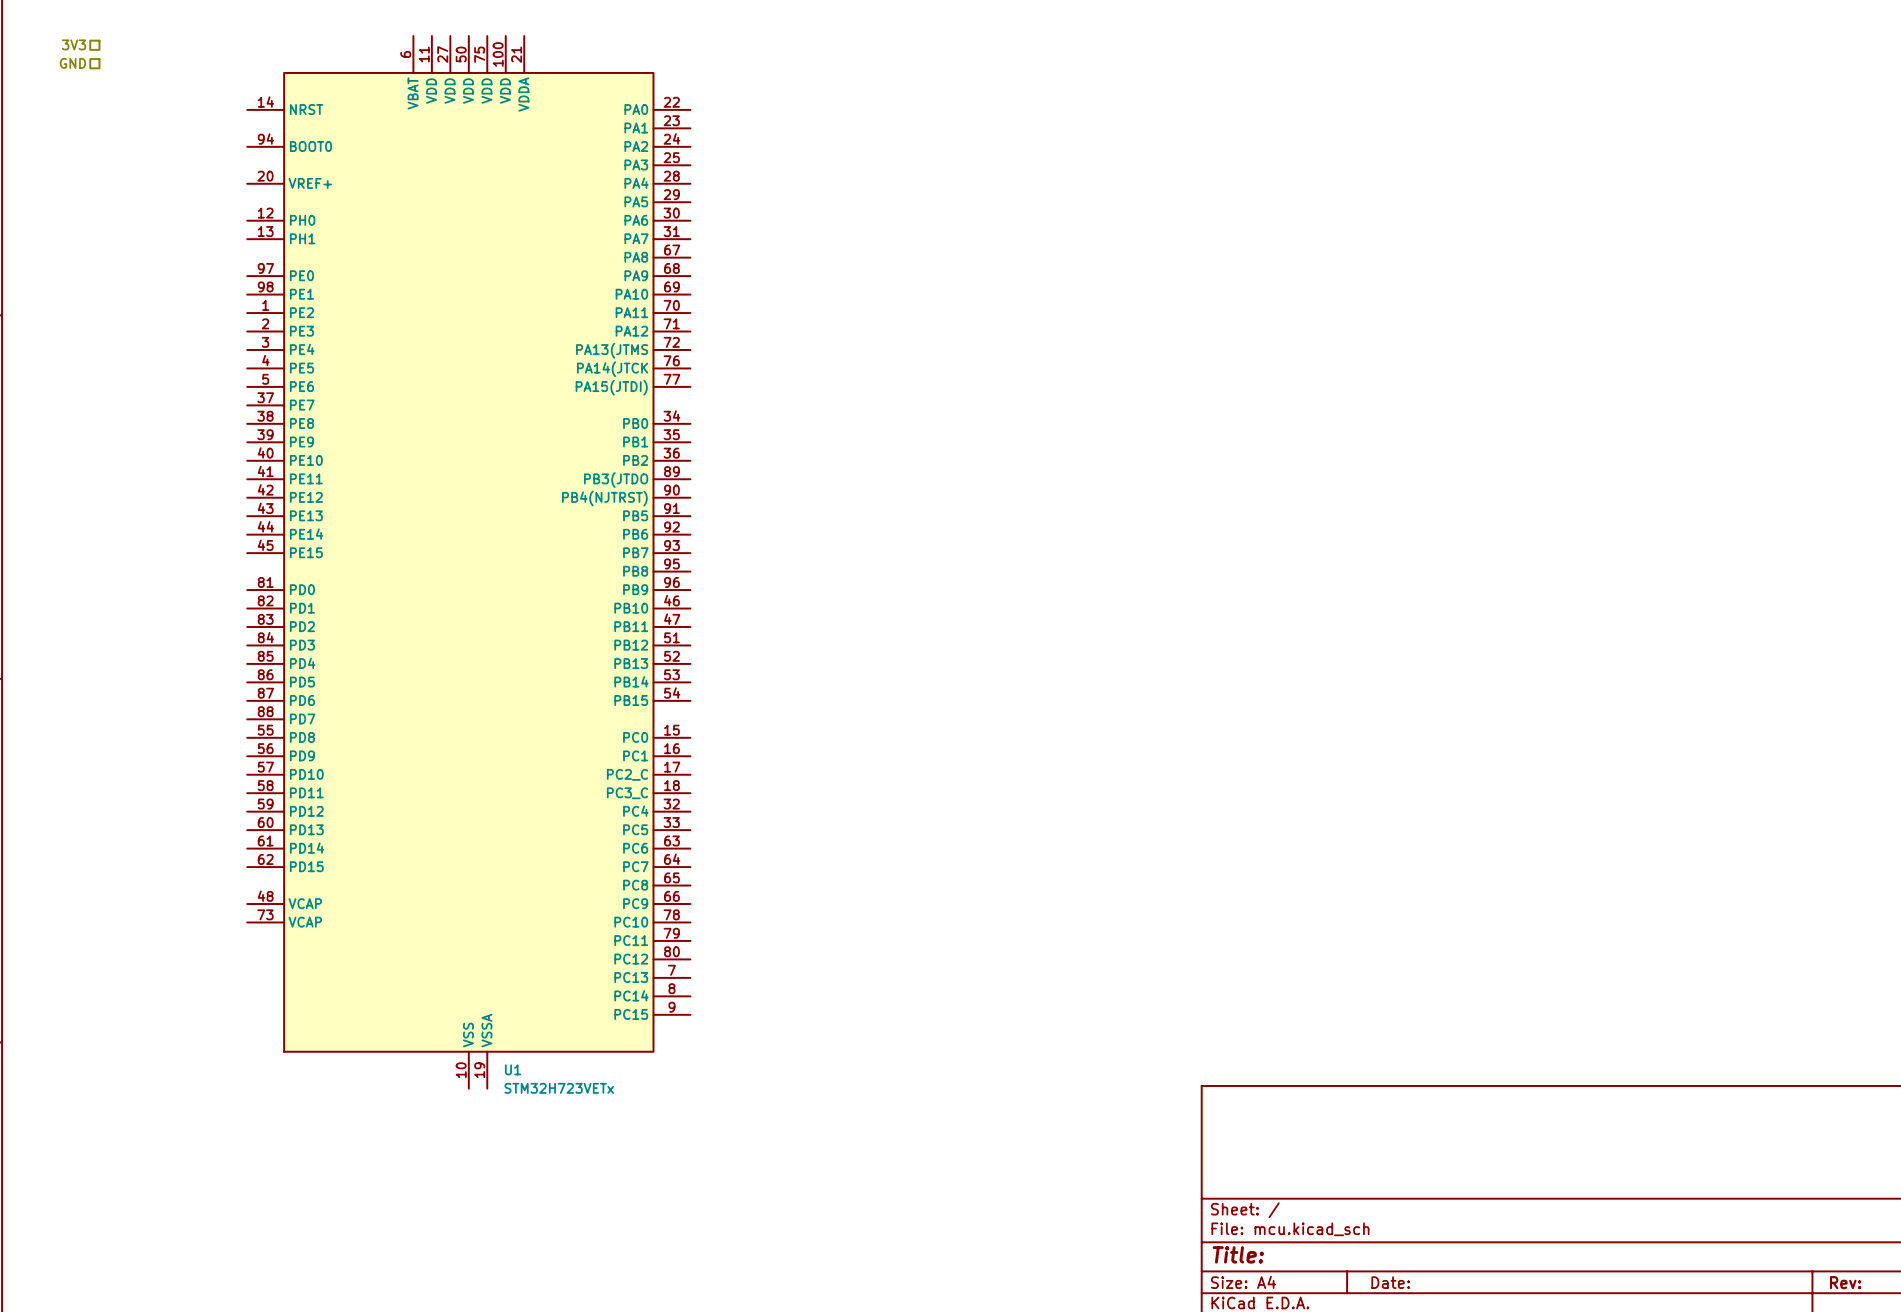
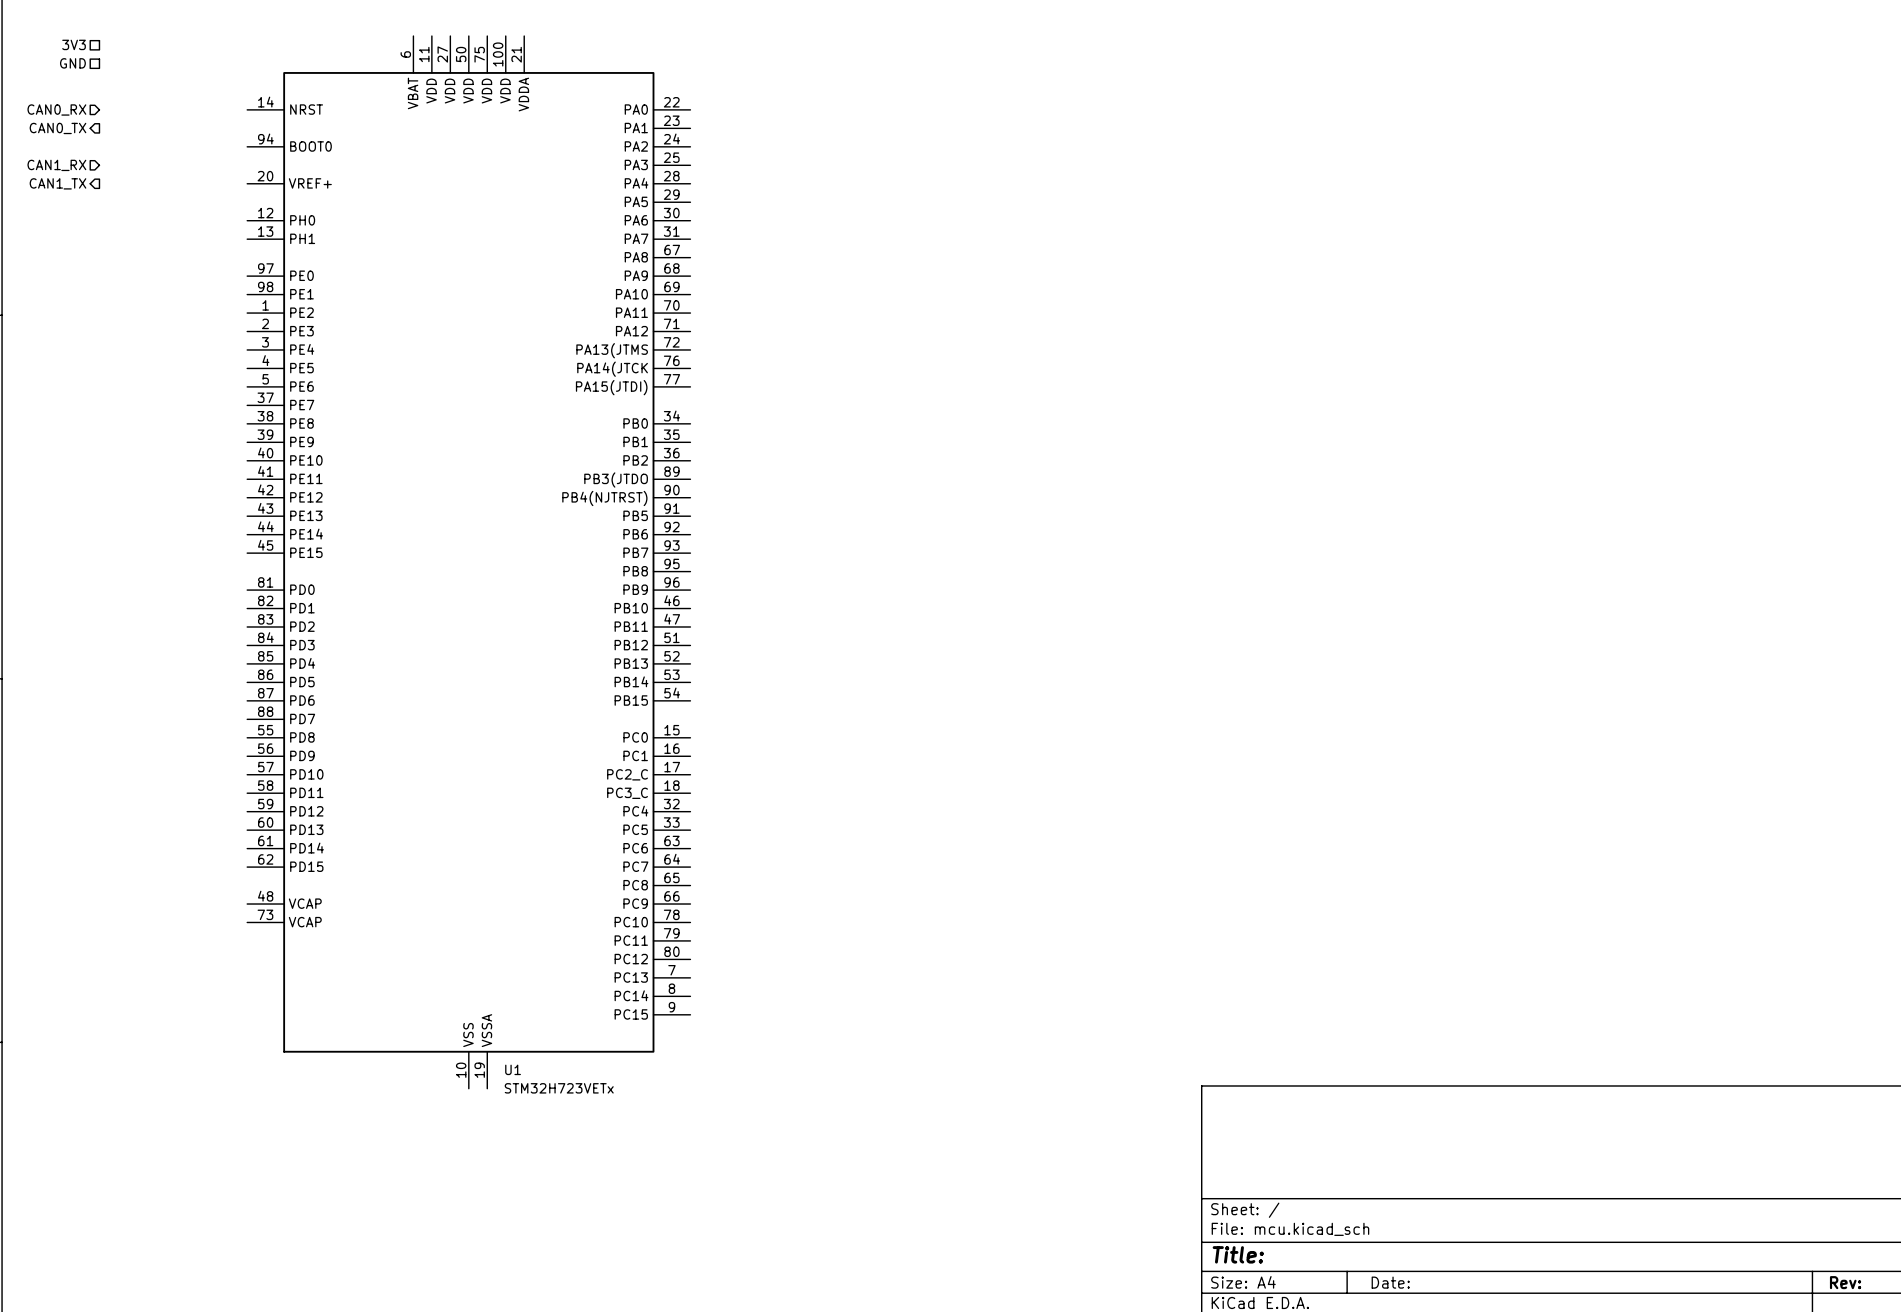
hierarchical label: none -> CAN0_RX (56, 109)
hierarchical label: none -> CAN0_TX (57, 128)
hierarchical label: none -> CAN1_RX (56, 165)
hierarchical label: none -> CAN1_TX (57, 183)

